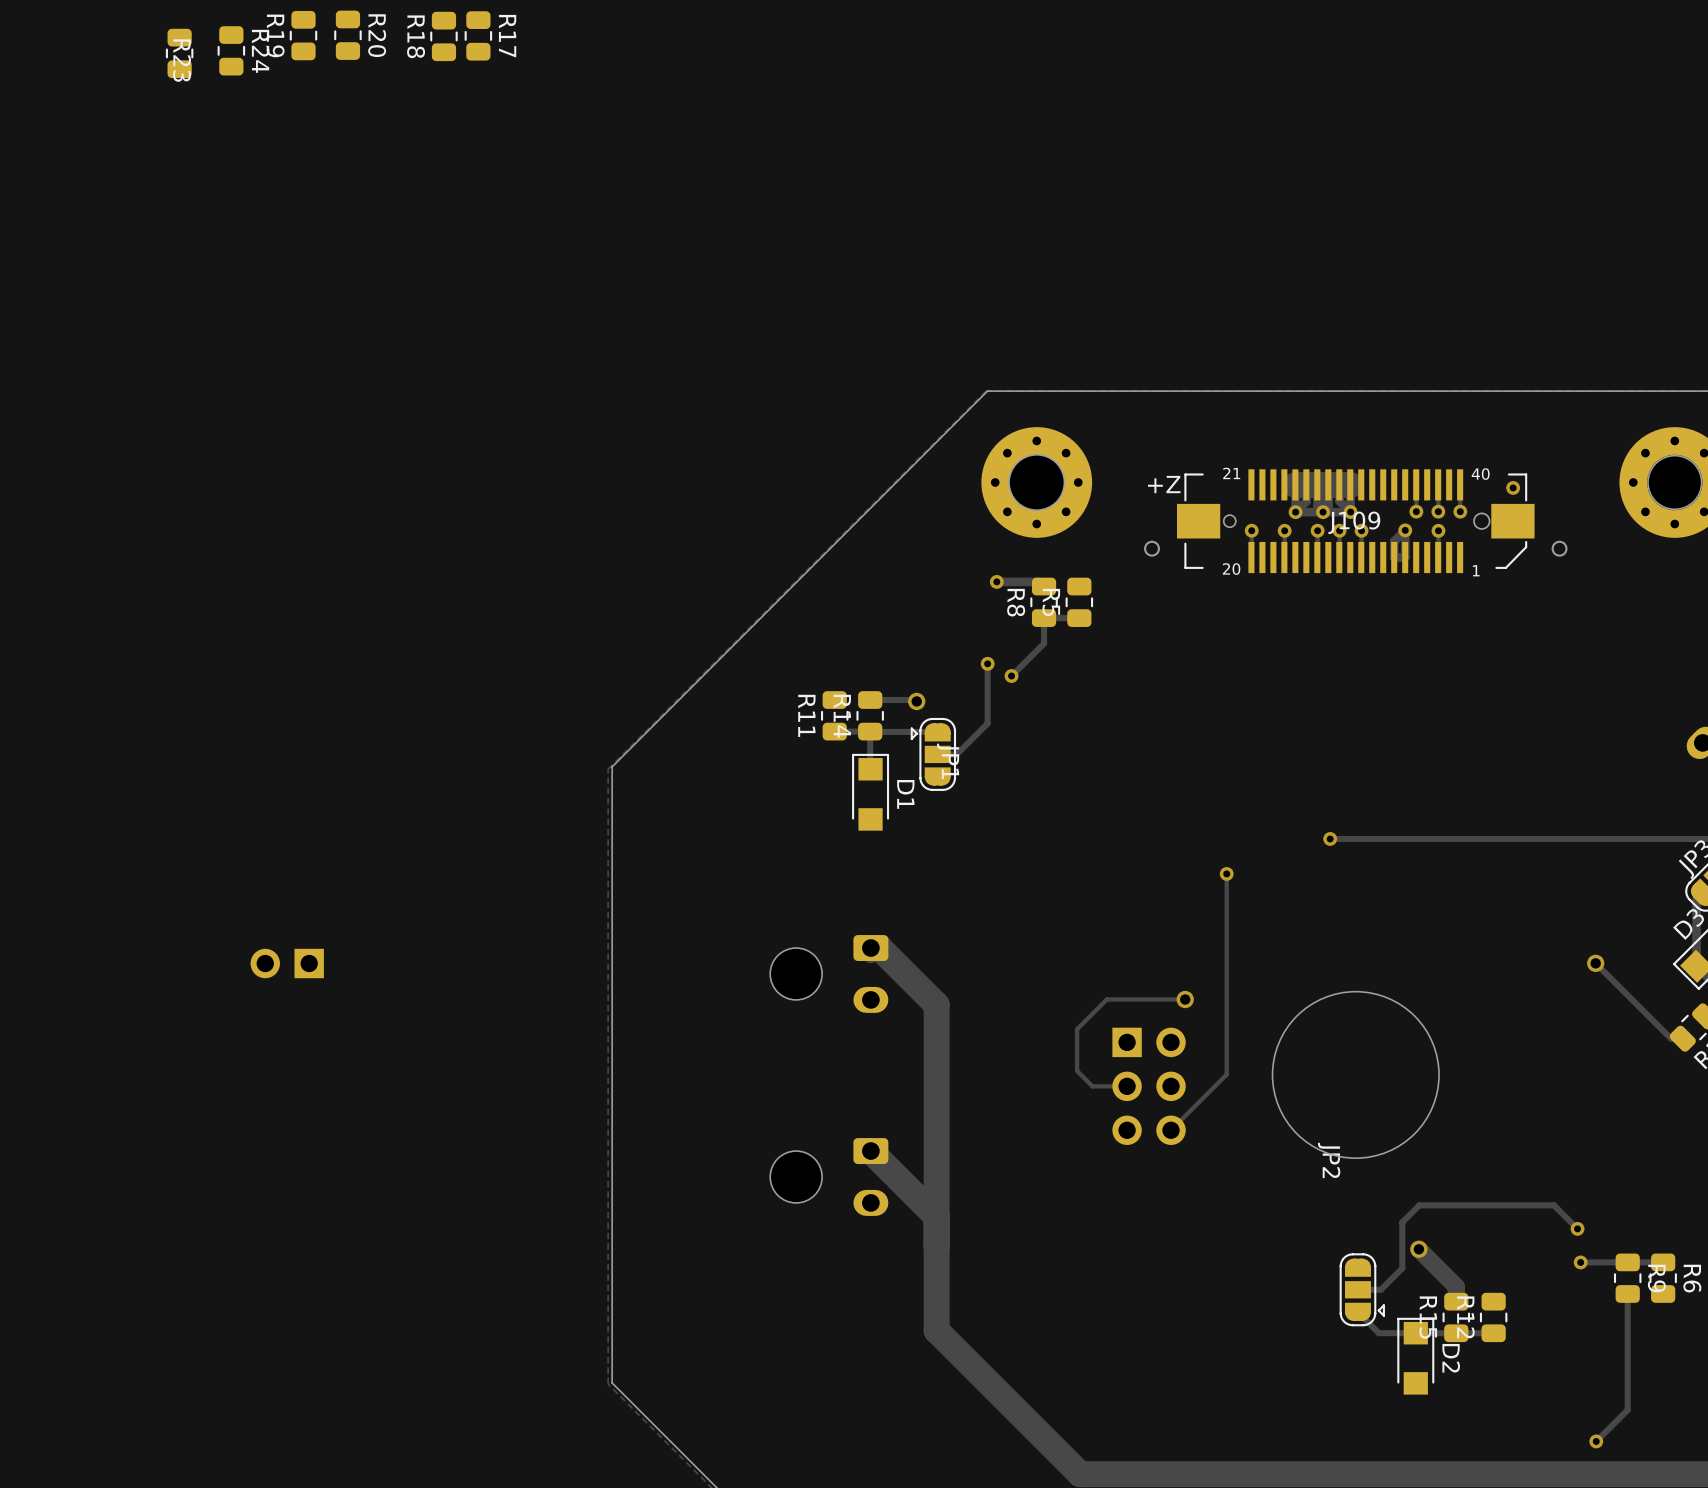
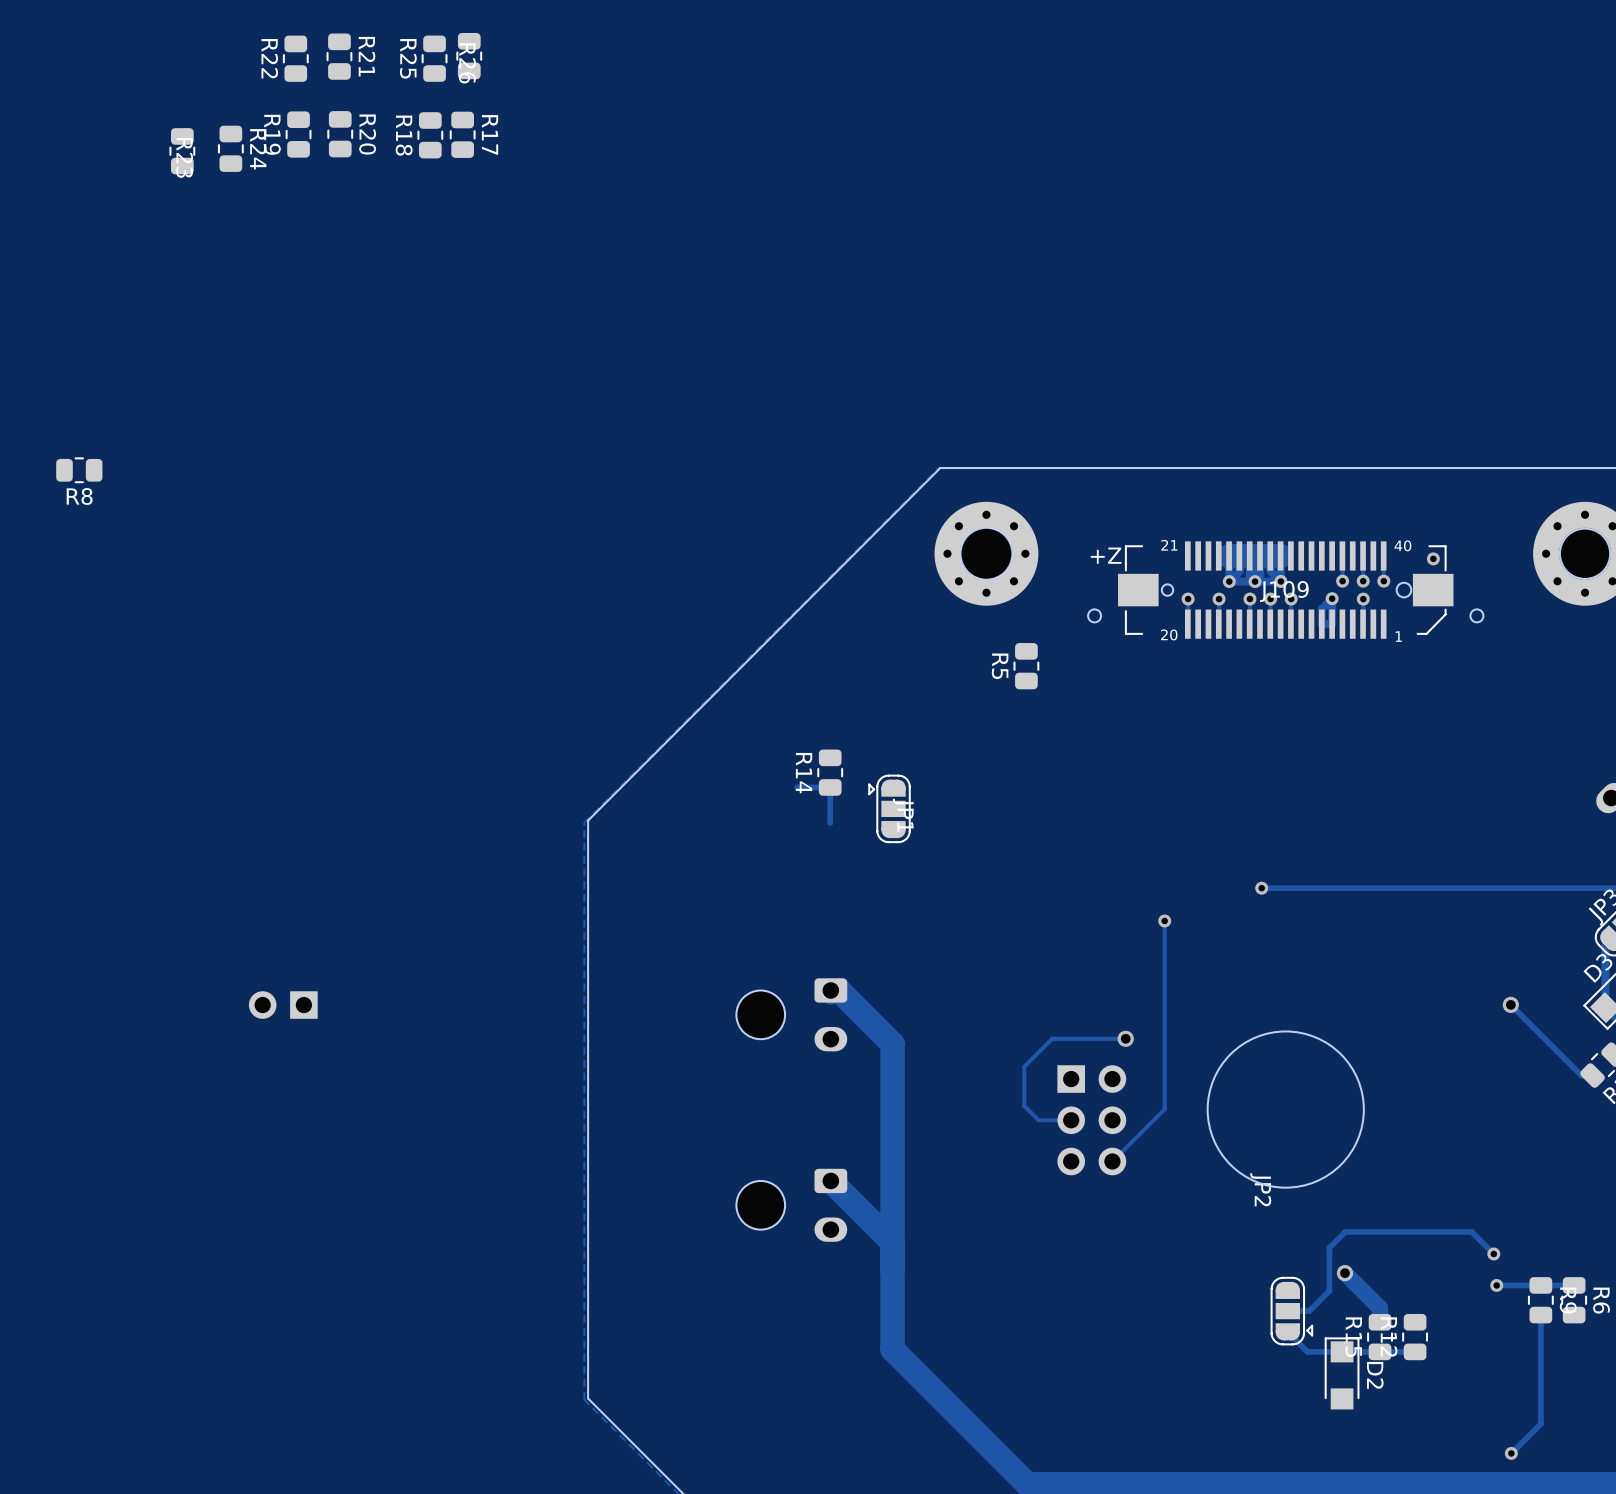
track: (996, 581) (1039, 581) (1044, 586) -> none
via: (996, 581) -> none
R8 name position: R8 (1016, 602) -> R8 (79, 496)
R8 rotation: 0° (1044, 602) -> 90° clockwise (79, 470)
R8 position: (1044, 602) -> (79, 470)
track: (1079, 618) (1044, 618) (1044, 643) (1011, 676) -> none
track: (987, 663) (987, 723) (956, 754) (937, 754) -> none
via: (987, 663) -> none
via: (1011, 676) -> none
track: (870, 700) (916, 701) -> none
via: (916, 701) -> none
R11: (834, 715) -> none
track: (870, 731) (937, 731) -> none
D1: (870, 792) -> none

